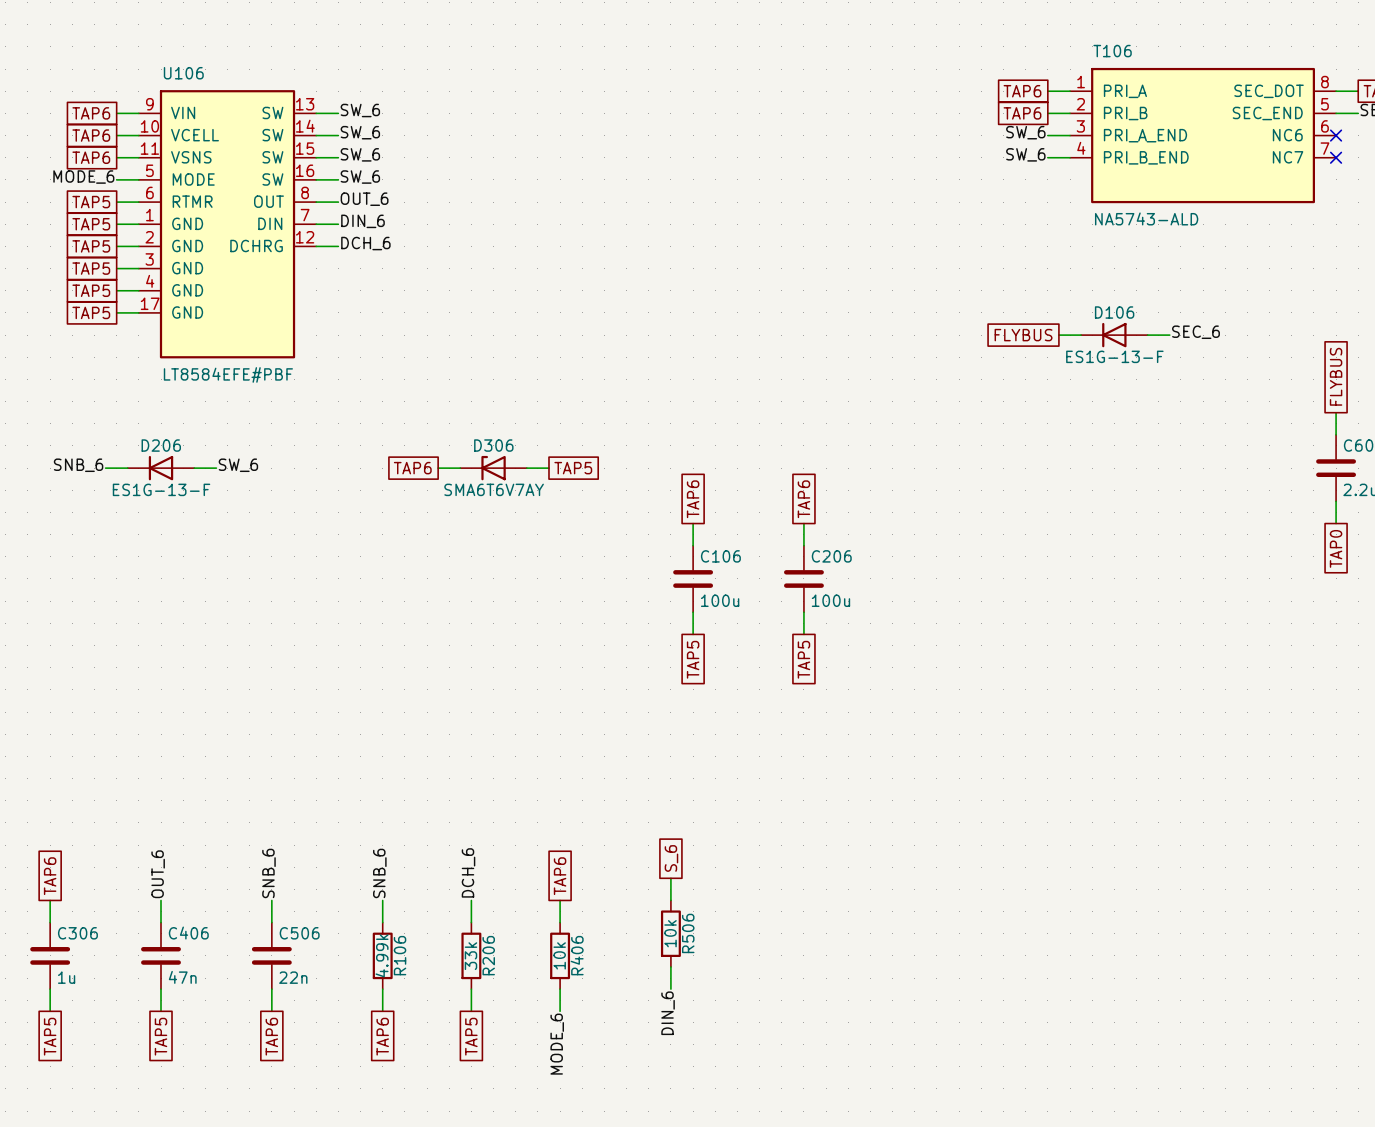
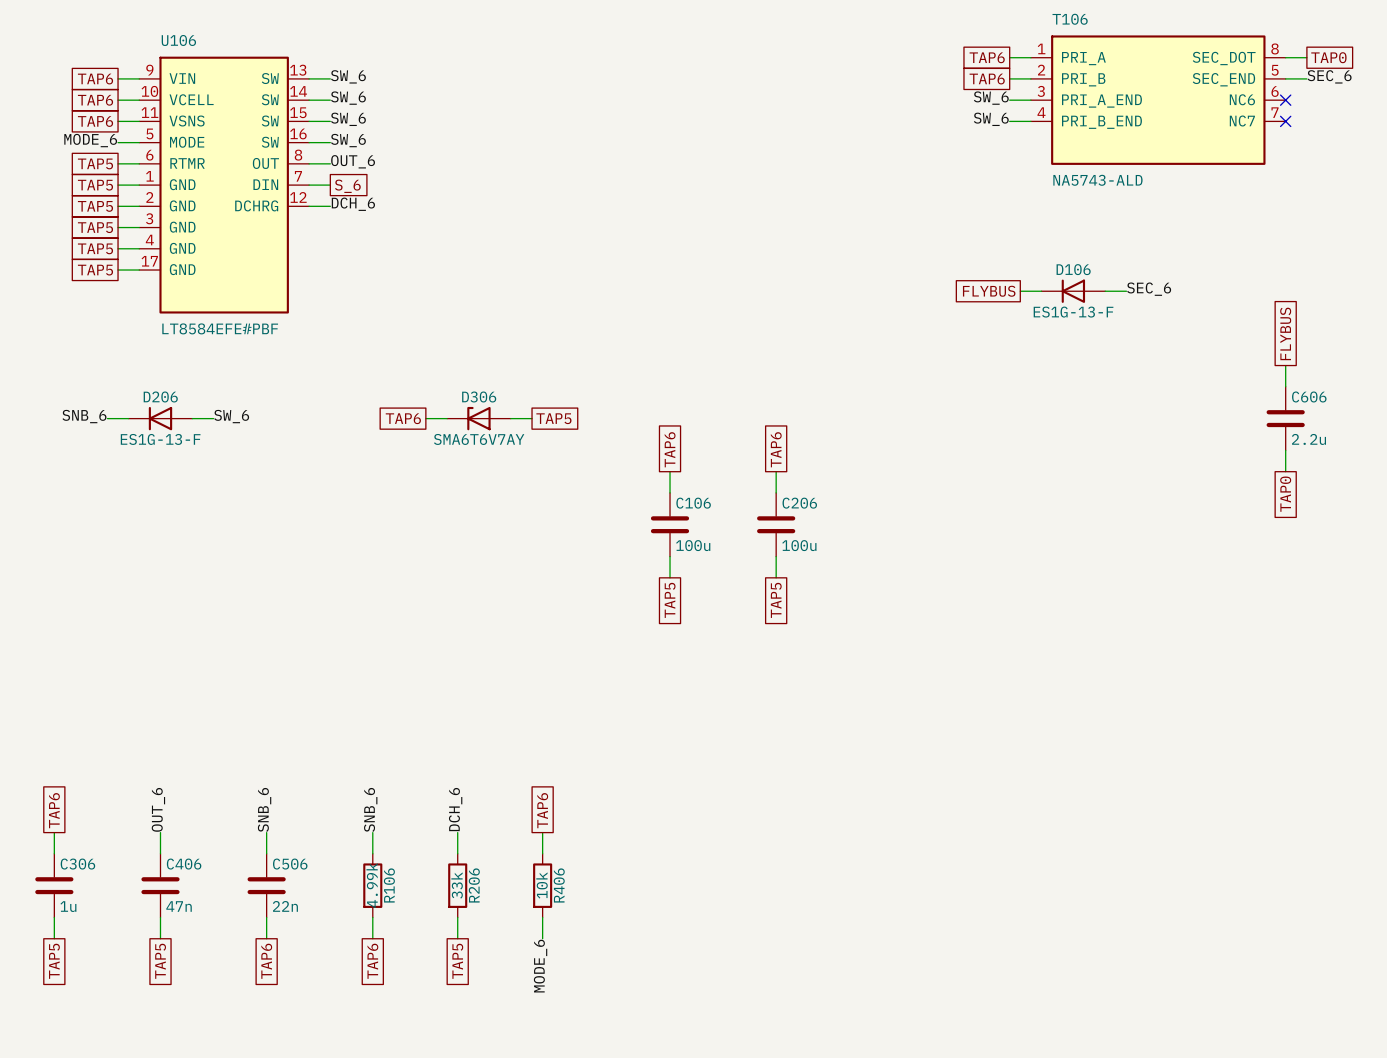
label: DIN_6 (362, 221) -> none
global label: none -> S_6 (347, 186)
global label: S_6 (671, 858) -> none
wire: (670, 878) (670, 900) -> none
R506: 10k (670, 933) -> none
wire: (670, 966) (670, 989) -> none
label: DIN_6 (668, 1013) -> none

